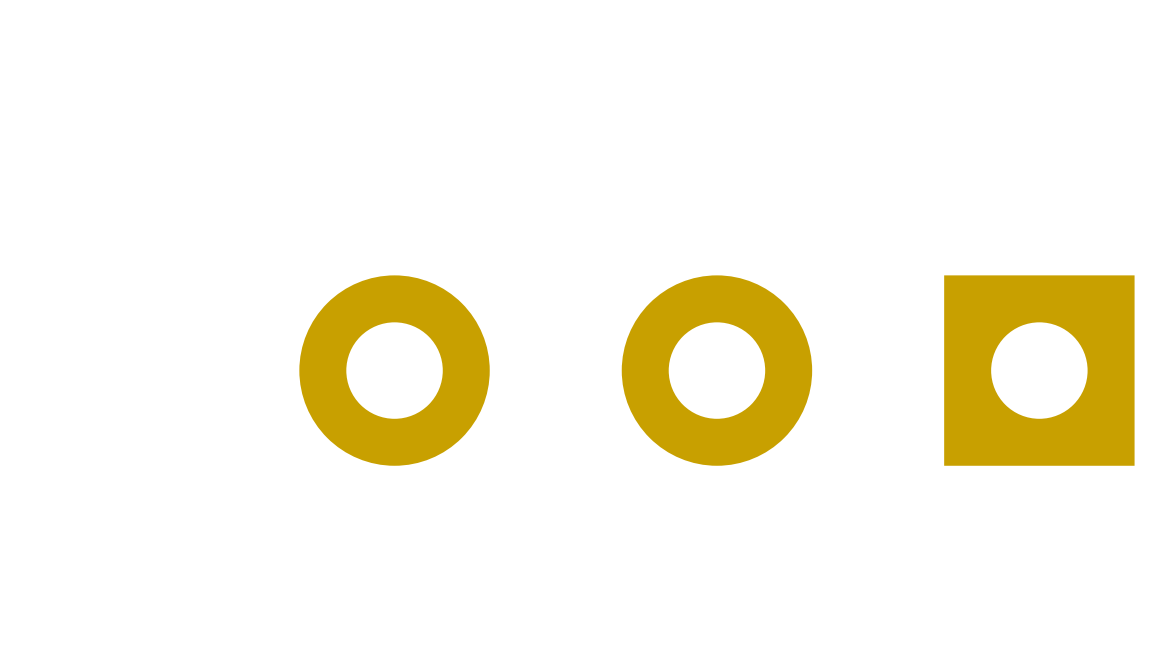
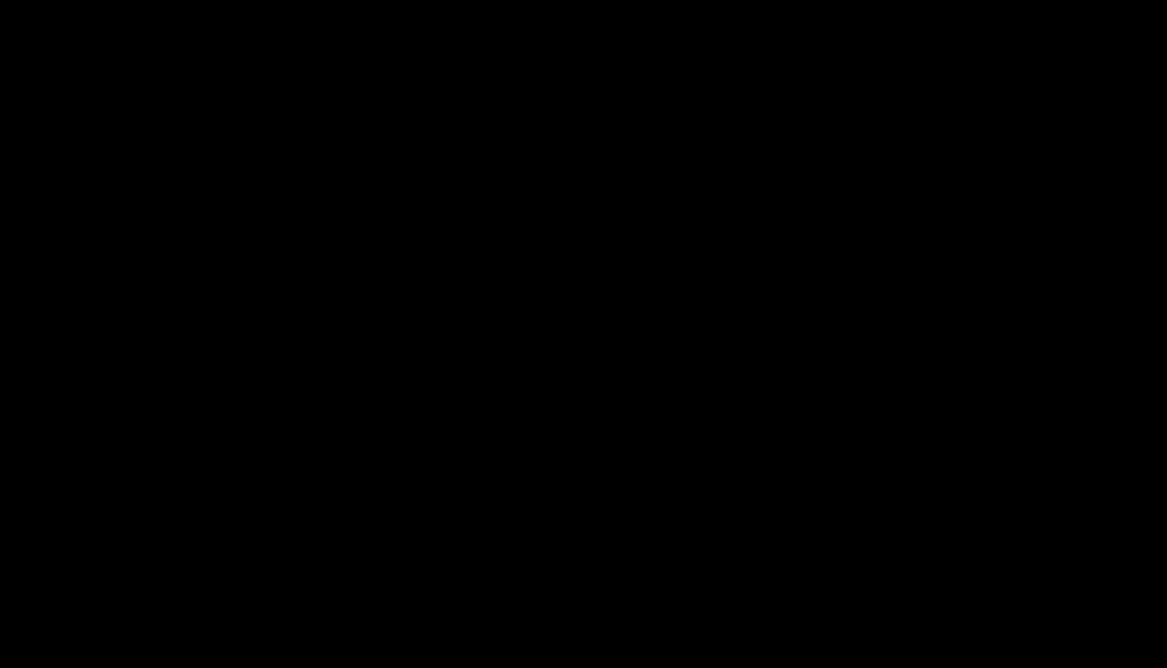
part: (716, 370) -> none

